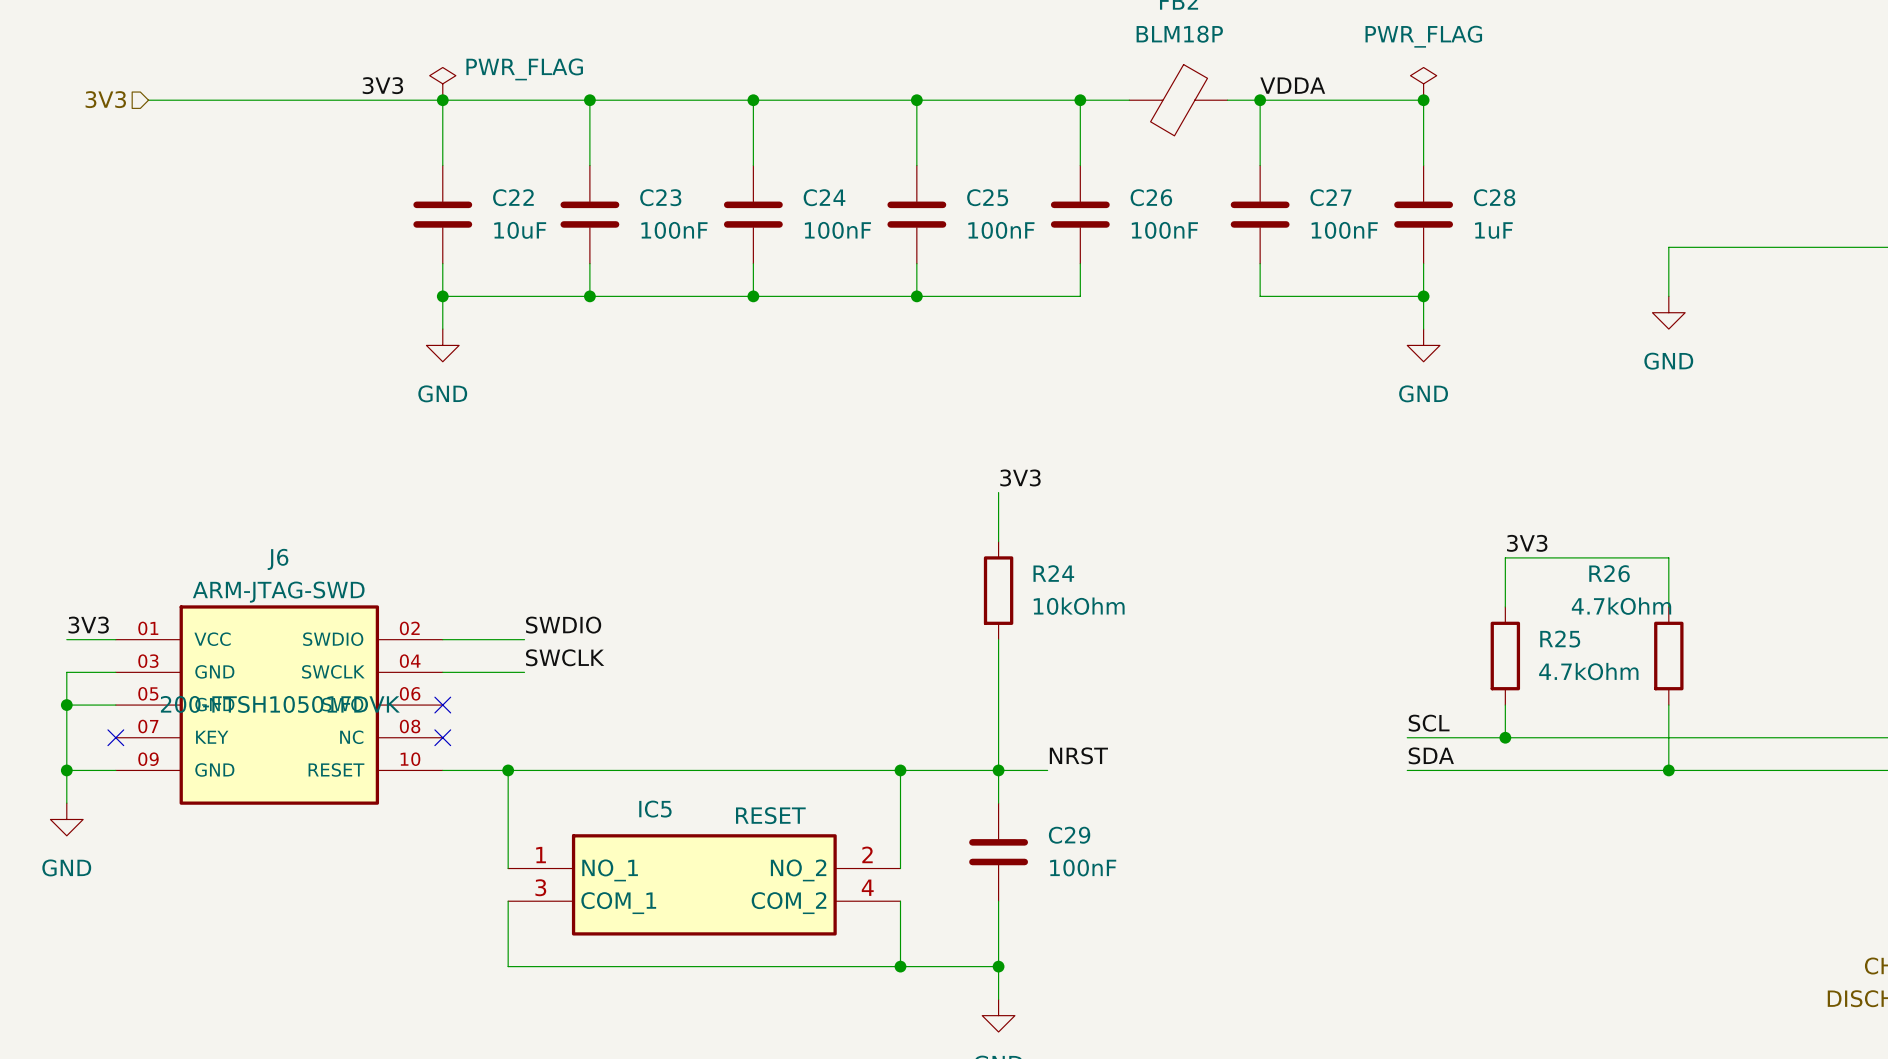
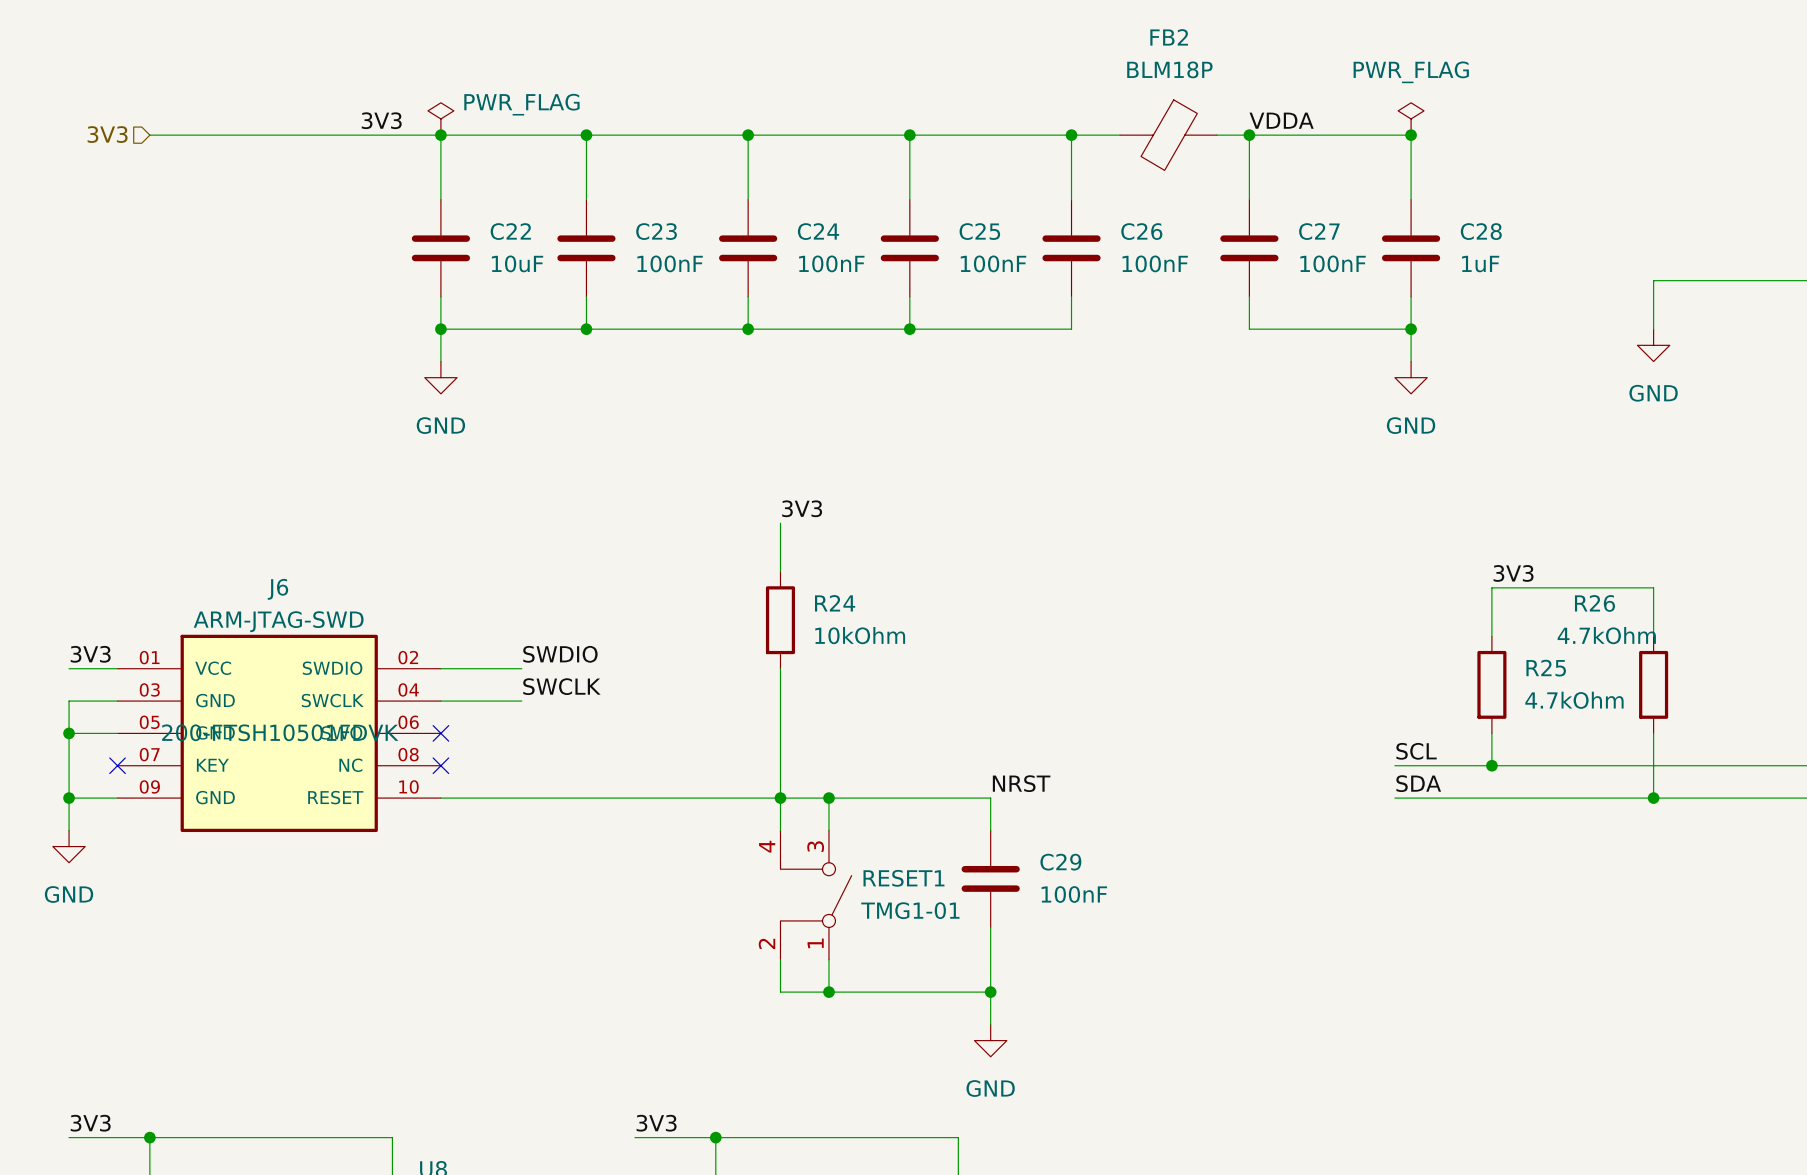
label position: 3V3 (1020, 477) -> 3V3 (802, 508)
wire: (998, 492) (998, 541) -> (780, 523) (780, 571)
R24 position: (998, 590) -> (780, 620)
wire: none -> (780, 668) (780, 830)
wire: (998, 639) (998, 770) (1047, 770) -> none
label position: NRST (1078, 755) -> NRST (1021, 783)
wire: (508, 770) (508, 868) -> none
junction: (508, 770) -> none
junction: none -> (780, 798)
wire: none -> (828, 798) (828, 830)
junction: none -> (828, 798)
wire: (900, 770) (900, 868) -> none
junction: (900, 770) -> none
junction: (998, 770) -> none
RESET1: none -> TMG1-01 (816, 895)
IC5: RESET (704, 884) -> none
wire: (508, 901) (508, 966) (786, 966) -> (780, 959) (780, 992)
wire: (900, 901) (900, 966) -> none
wire: none -> (828, 959) (828, 992)
junction position: (900, 966) -> (828, 992)

